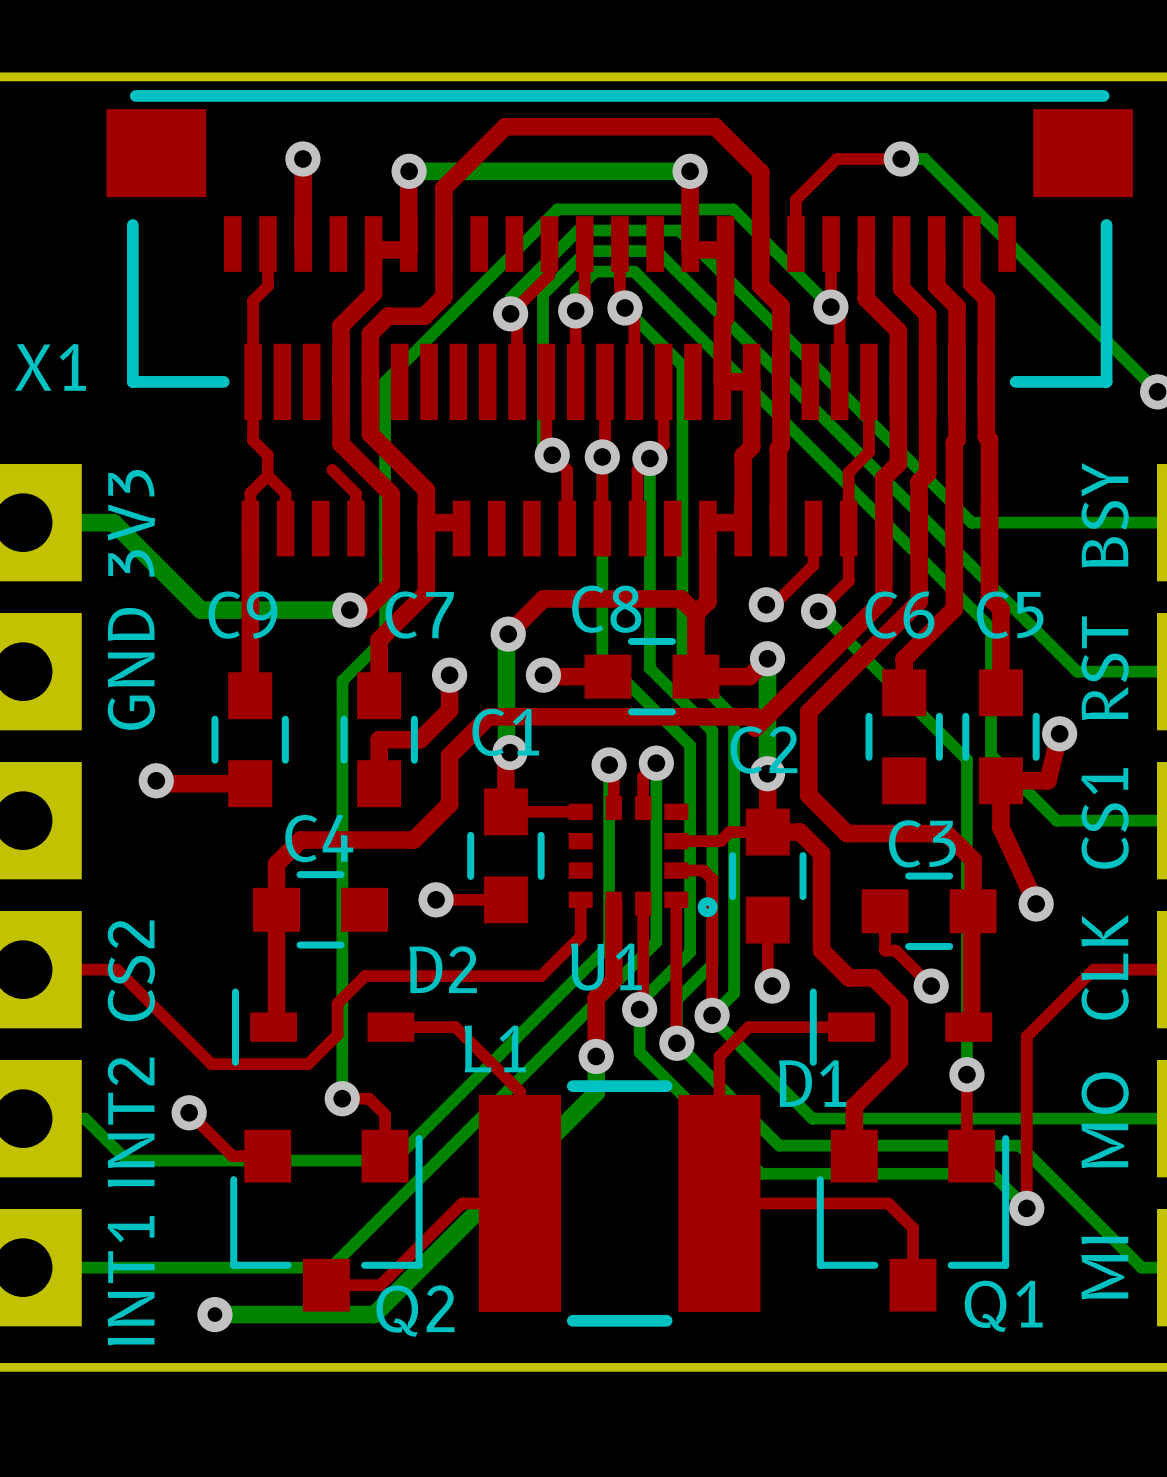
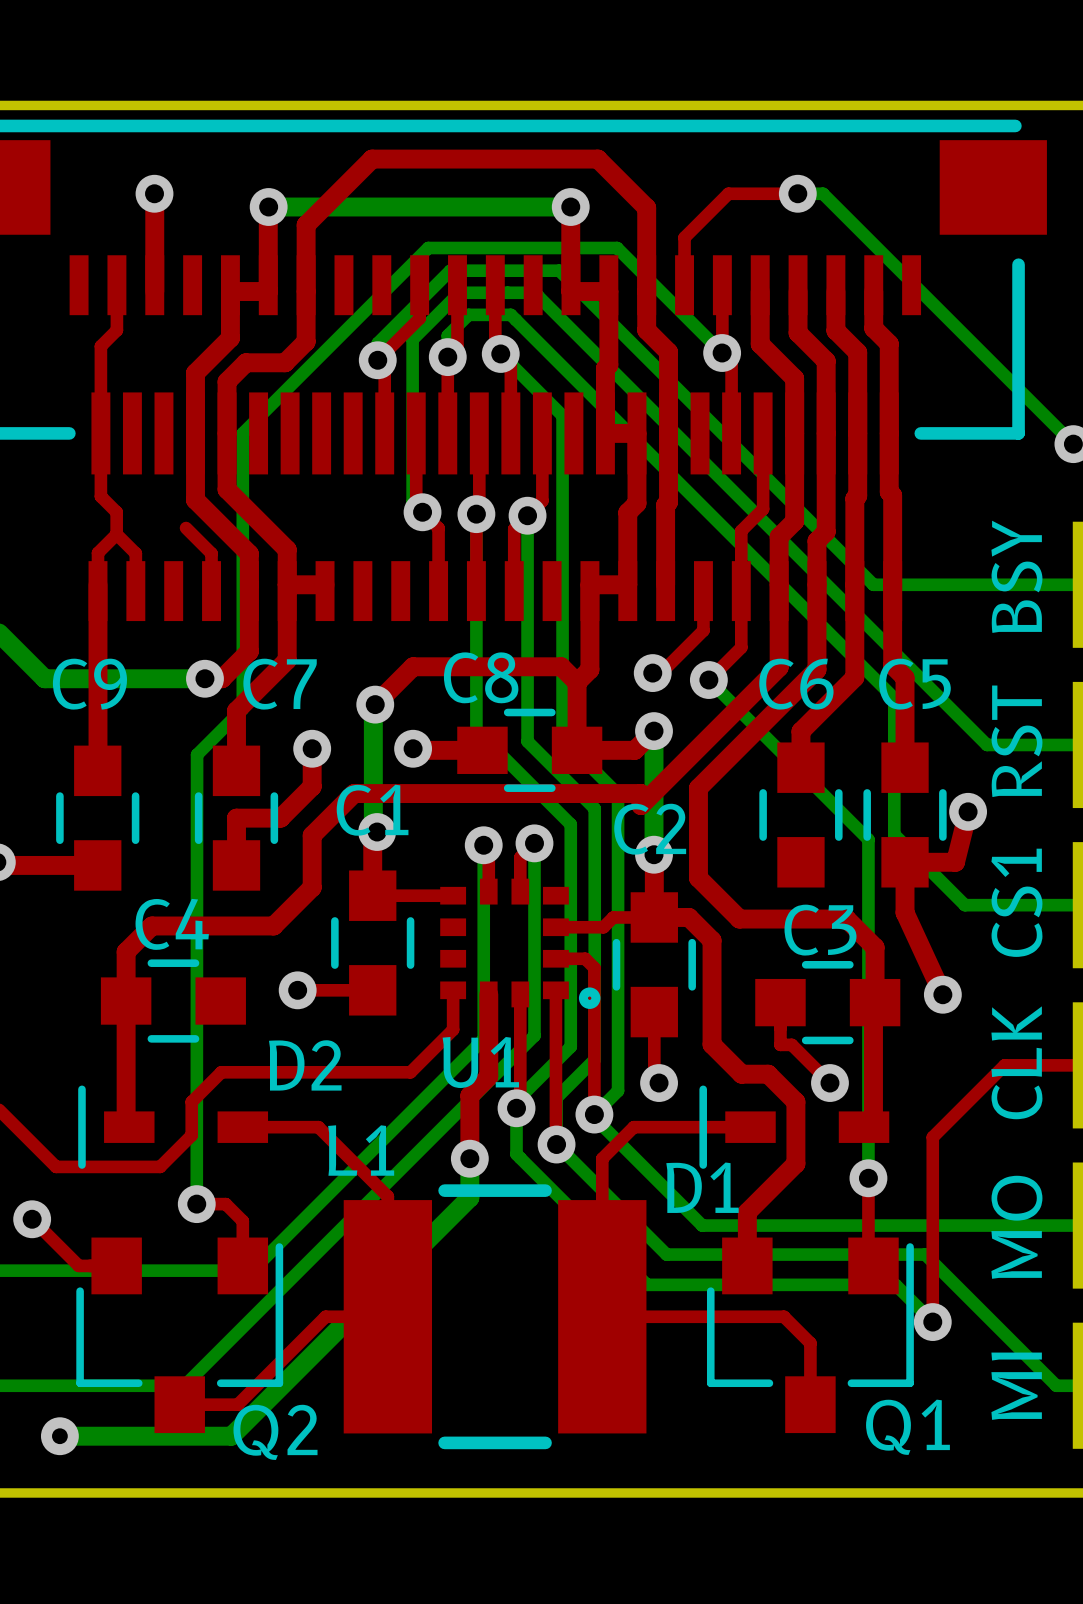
D2 footprint: [231, 988, 415, 1066] -> [78, 1085, 269, 1169]
D1 footprint: [809, 988, 993, 1066] -> [699, 1085, 890, 1169]

